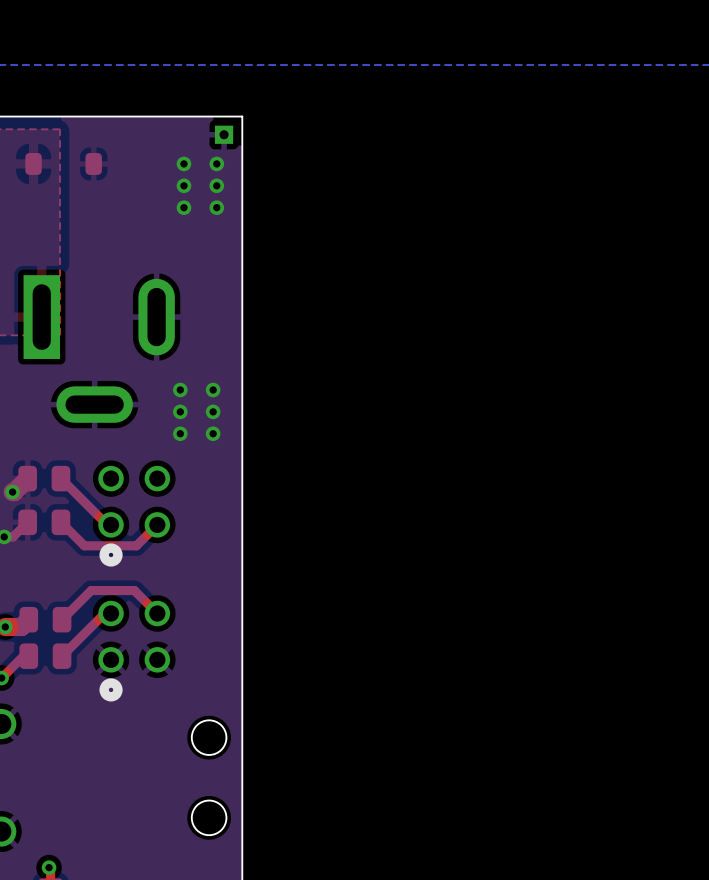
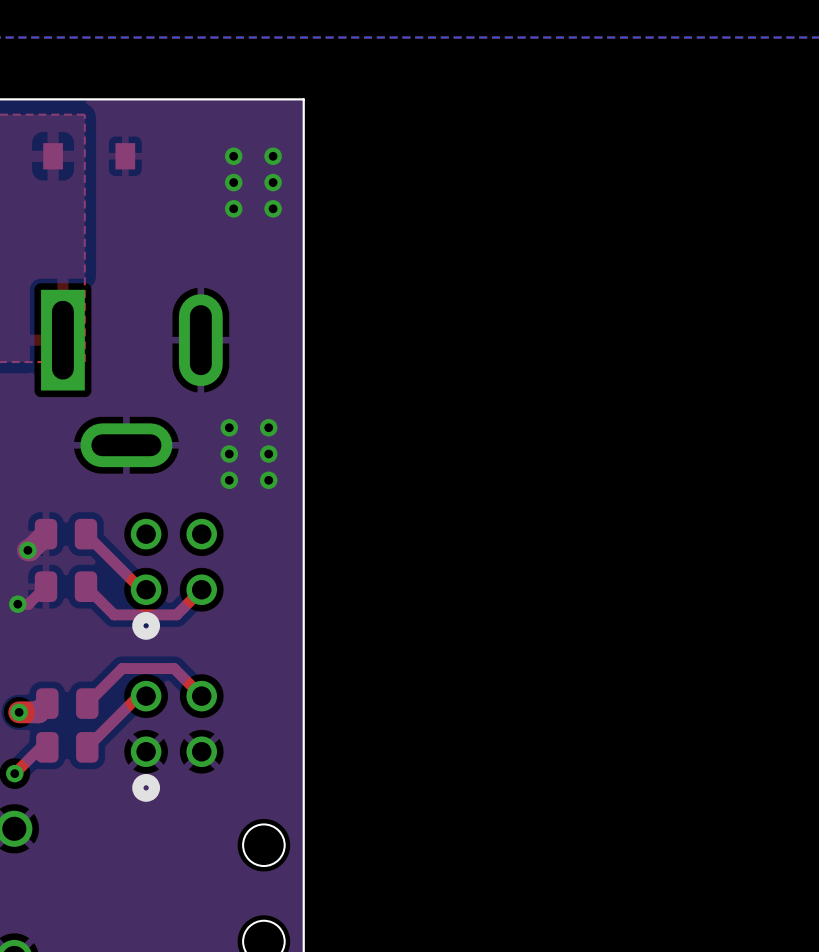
part: (224, 134) -> none
part footprint: [25, 153, 102, 175] -> [43, 143, 136, 170]

